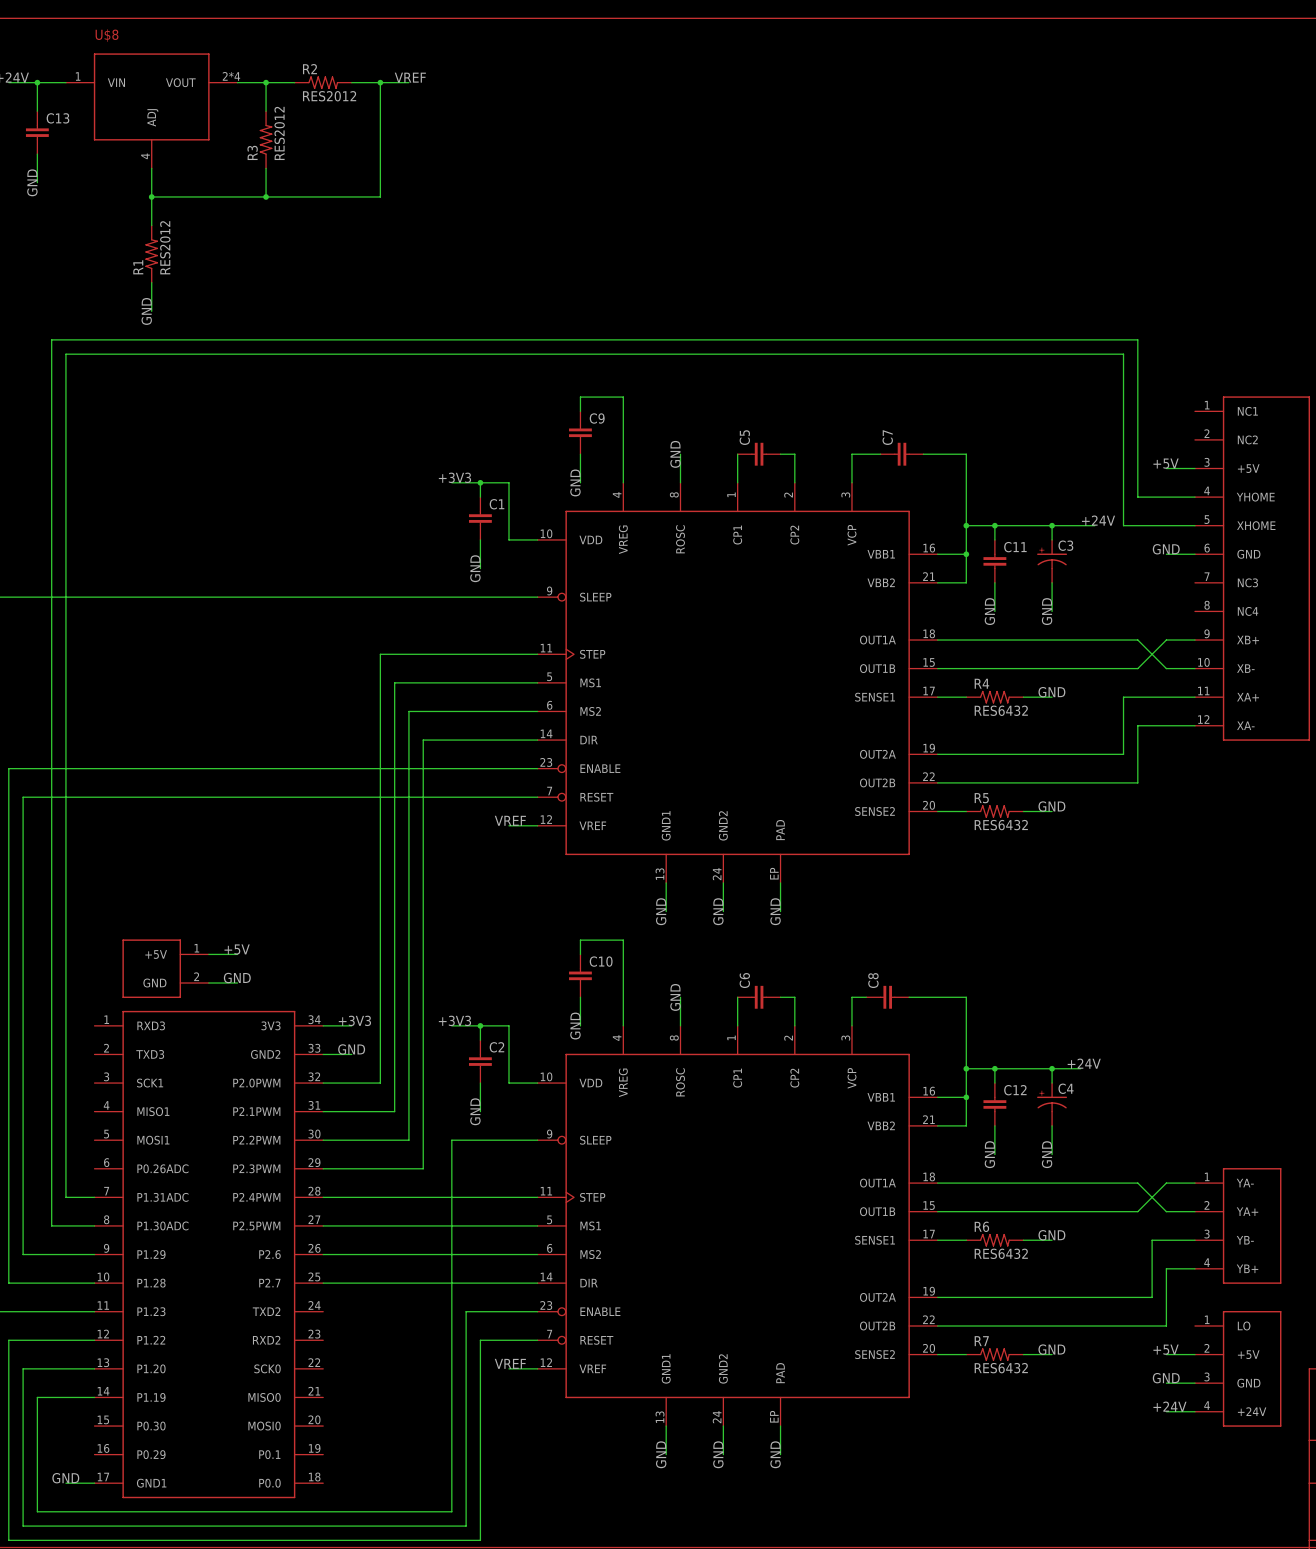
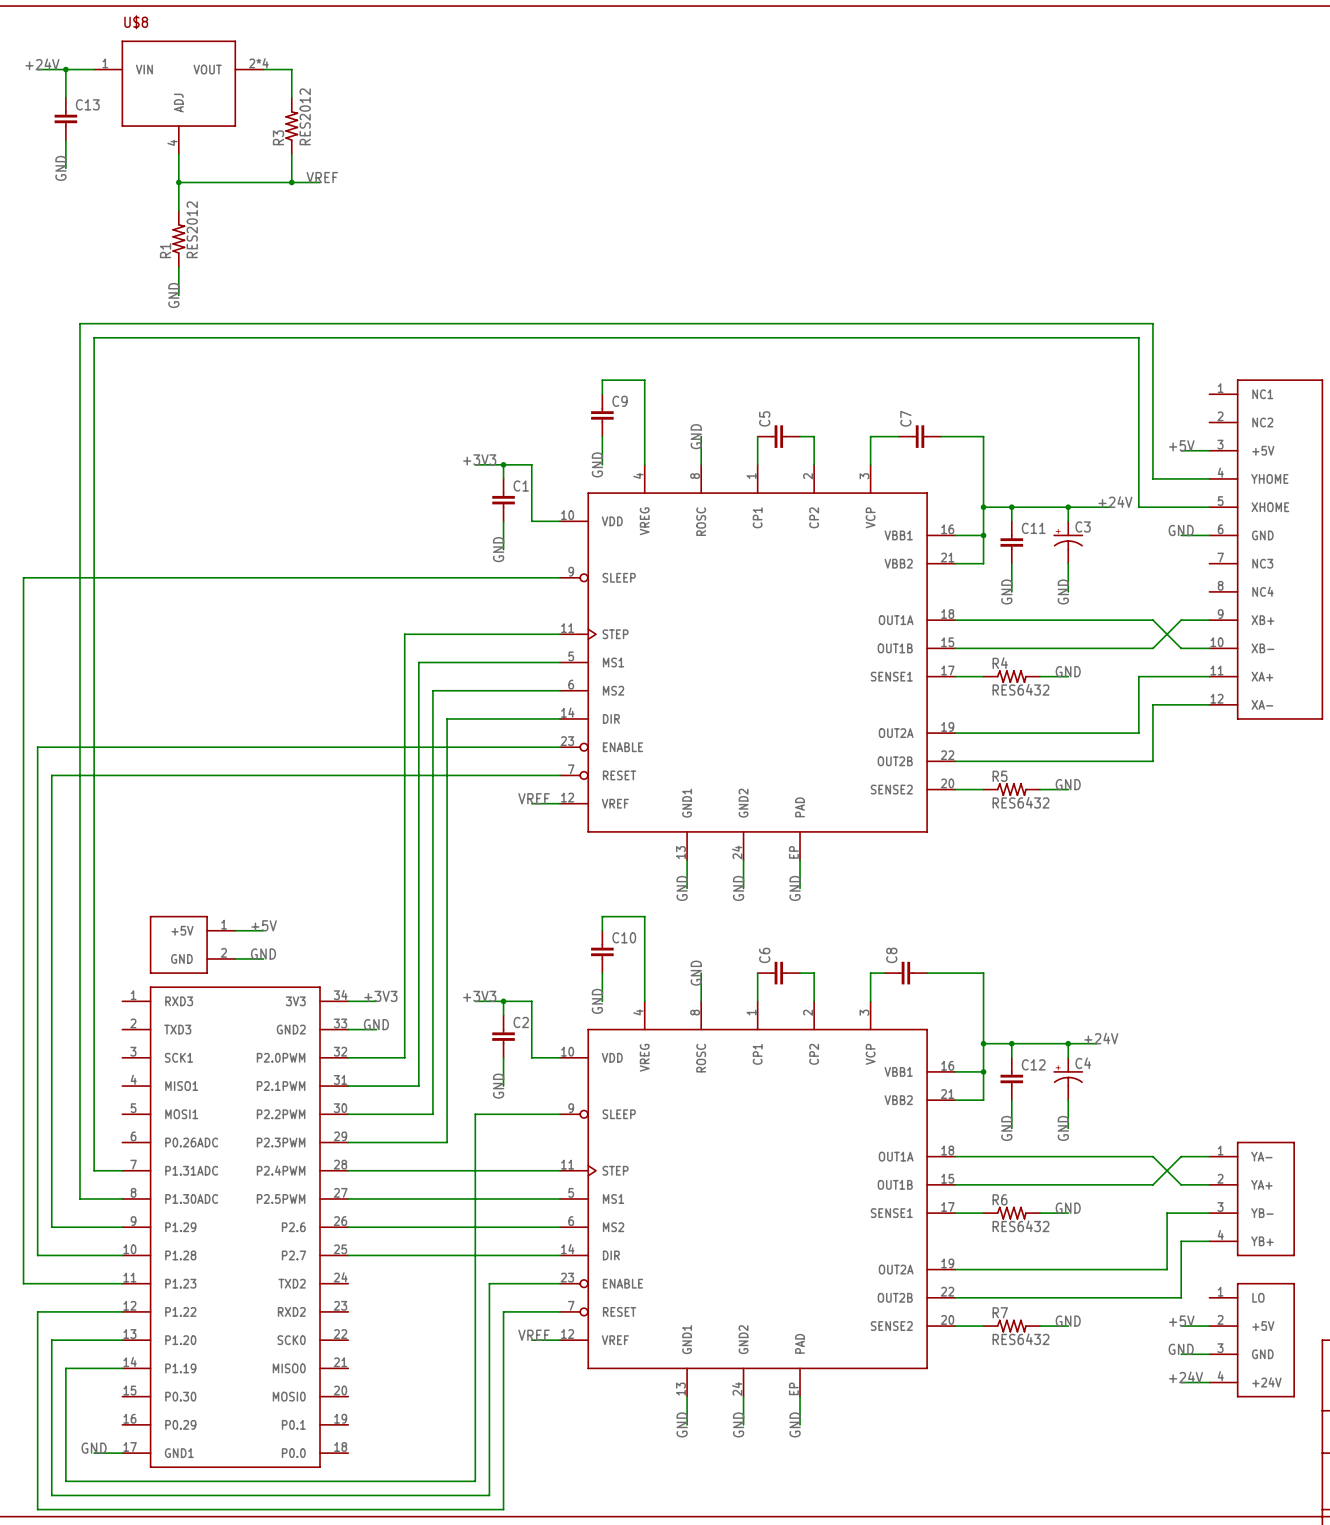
label: VREF (410, 77) -> none
wire: (266, 82) (294, 82) -> none
junction: (266, 82) -> none
R2: RES2012 (323, 82) -> none
wire: (351, 82) (408, 82) -> none
wire: (380, 82) (380, 196) (294, 196) -> none
junction: (380, 82) -> none
label: none -> VREF (322, 177)

